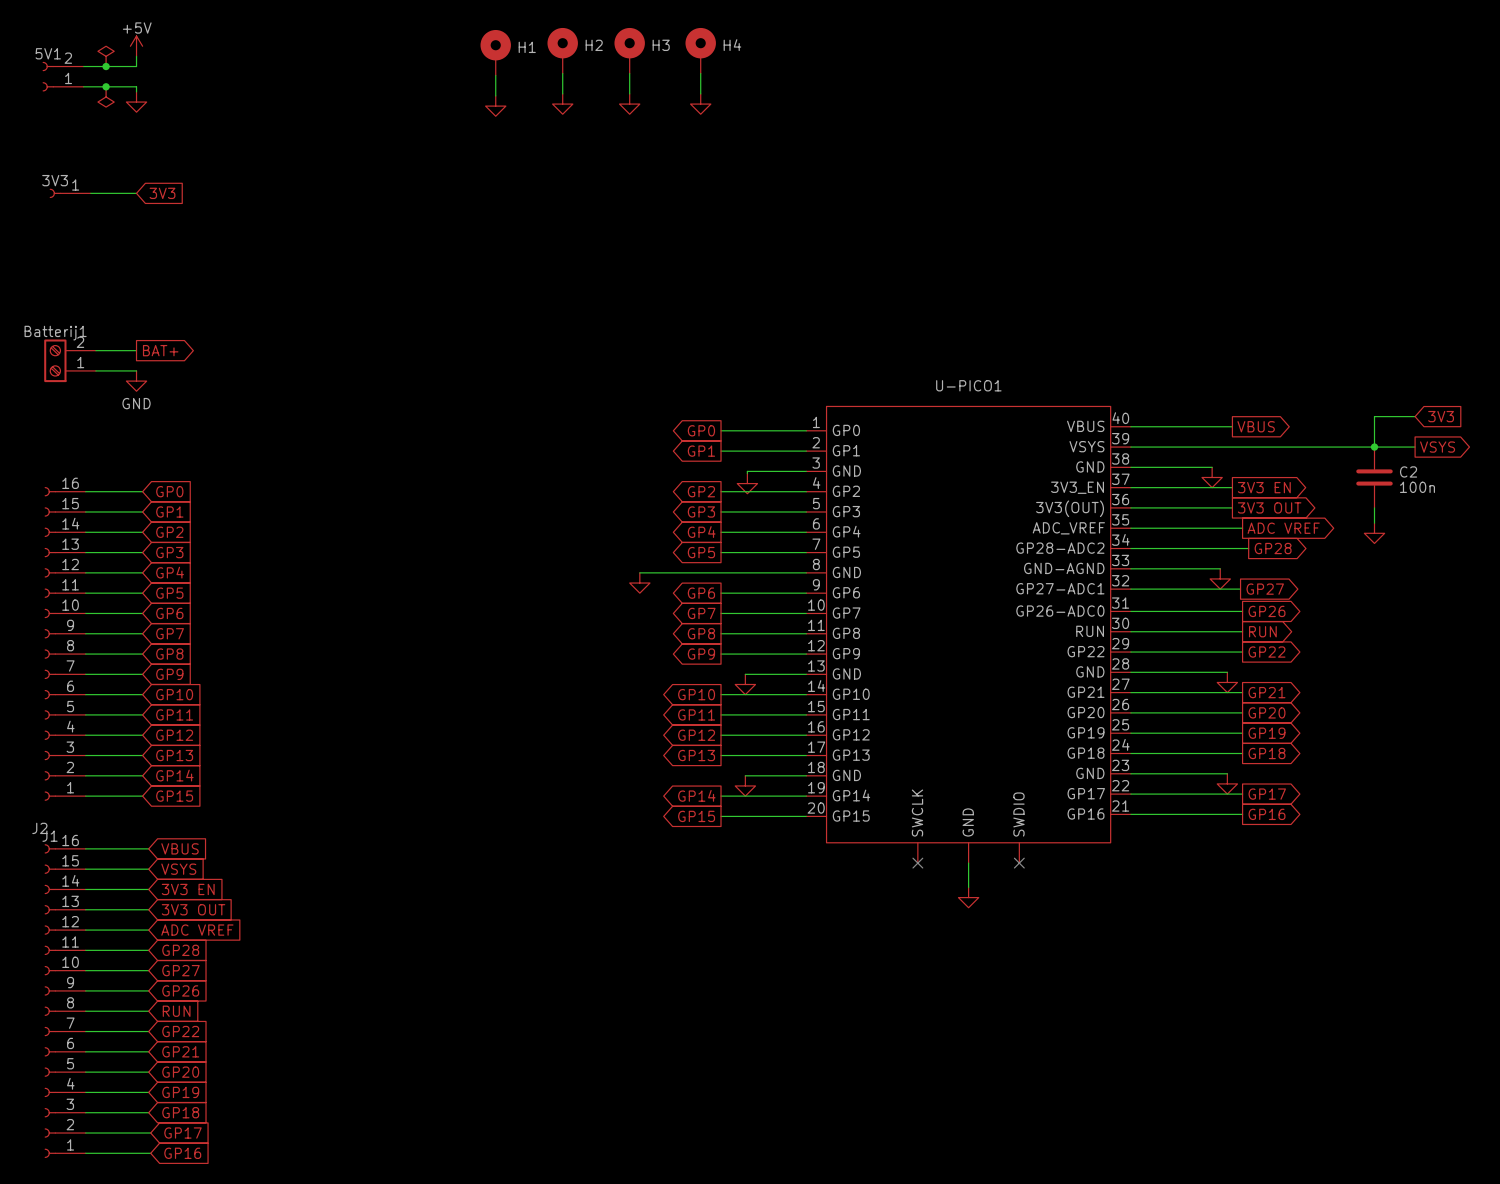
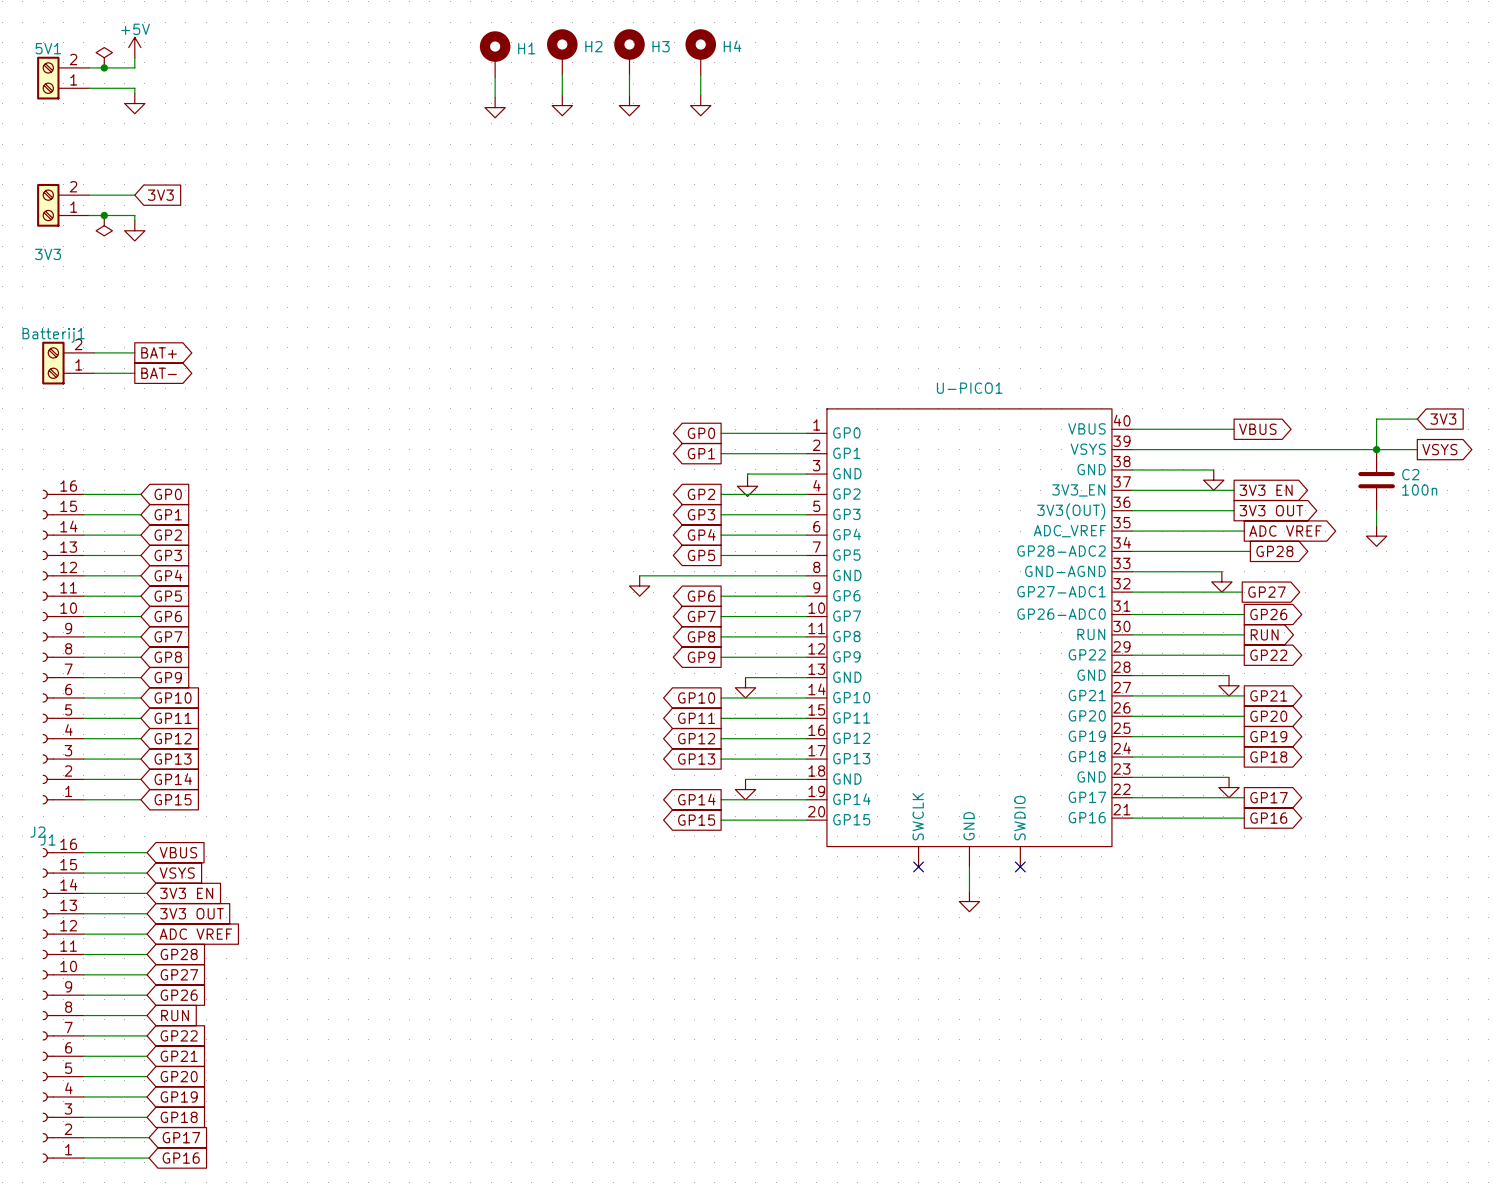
5V1 symbol: [42, 61, 84, 92] -> [37, 56, 90, 100]
junction: (106, 86) -> none
power symbol position: (106, 96) -> (104, 225)
3V3 name position: 3V3 (55, 180) -> 3V3 (48, 254)
3V3 symbol: [49, 188, 91, 199] -> [37, 183, 90, 227]
wire: none -> (89, 215) (134, 215) (134, 220)
junction: none -> (104, 215)
power symbol: none -> (134, 230)
global label: none -> BAT- (159, 373)
power symbol: GND (136, 381) -> none

